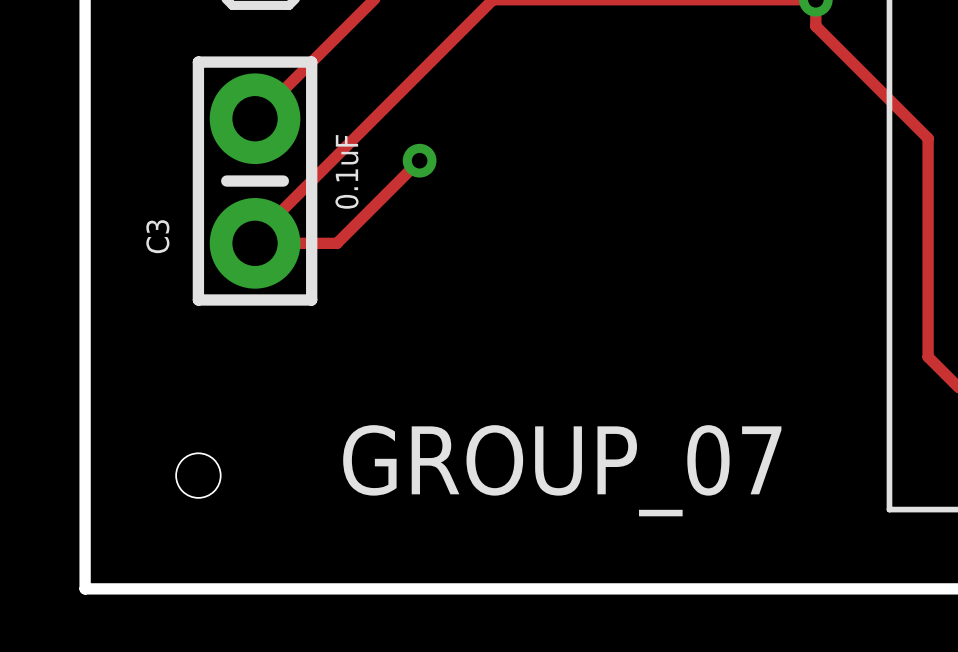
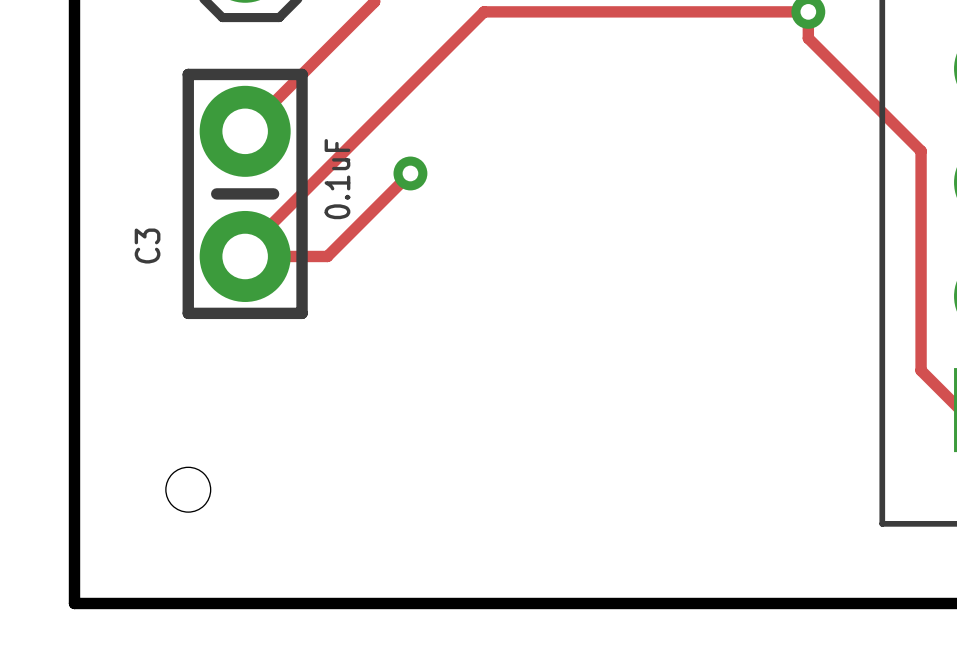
text: GROUP_07 (562, 470) -> none

